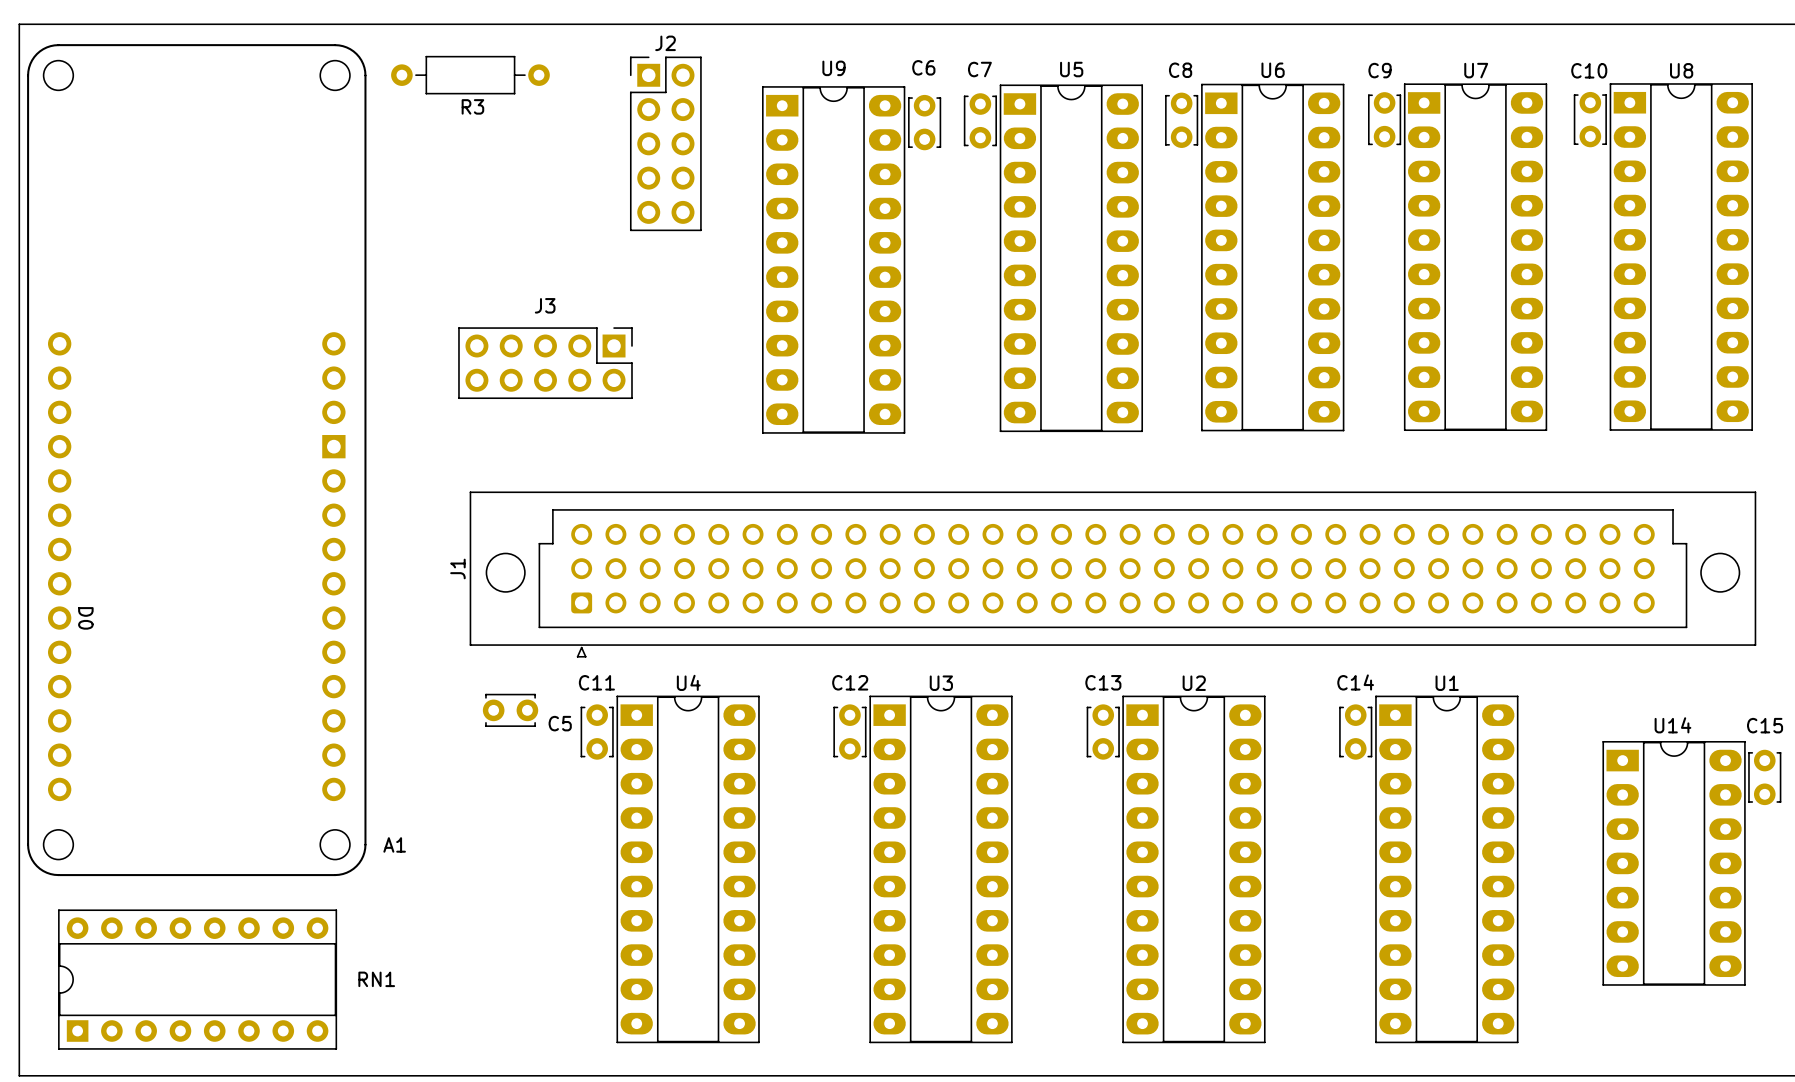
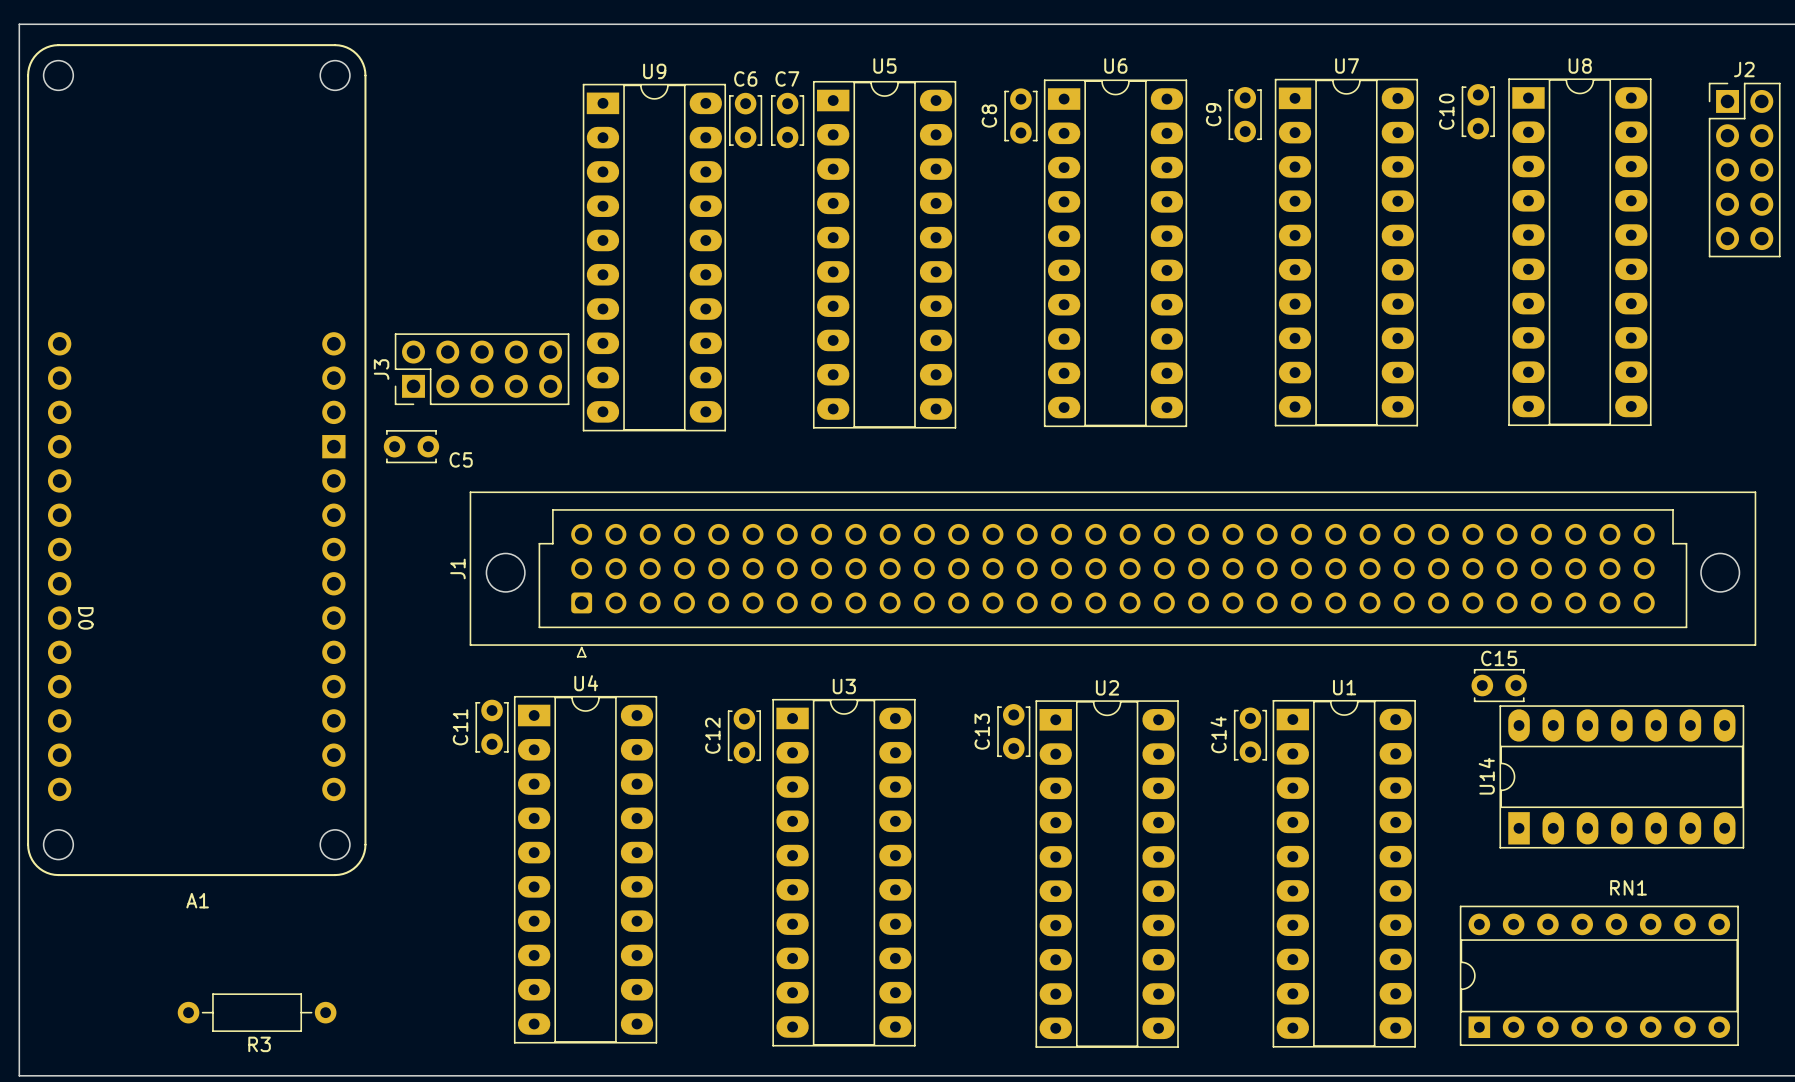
C6 name position: C6 (923, 67) -> C6 (745, 78)
U9 name position: U9 (833, 68) -> U9 (654, 71)
C7 name position: C7 (979, 69) -> C7 (787, 78)
C8 name rotation: 0° (1180, 70) -> 90° counterclockwise (989, 116)
C8 name position: C8 (1180, 70) -> C8 (989, 116)
C9 name rotation: 0° (1380, 70) -> 90° counterclockwise (1213, 114)
C9 name position: C9 (1380, 70) -> C9 (1213, 114)
C10 name rotation: 0° (1589, 70) -> 90° counterclockwise (1446, 111)
C10 name position: C10 (1589, 70) -> C10 (1446, 111)
R3 position: (470, 75) -> (257, 1012)
C9 position: (1384, 119) -> (1245, 114)
C10 position: (1590, 119) -> (1478, 111)
C7 position: (980, 120) -> (787, 120)
C8 position: (1181, 120) -> (1020, 116)
C6 position: (924, 122) -> (745, 120)
J2 position: (665, 143) -> (1744, 170)
U8 position: (1681, 256) -> (1579, 252)
U6 position: (1272, 257) -> (1115, 253)
U7 position: (1475, 257) -> (1346, 252)
U5 position: (1071, 258) -> (884, 254)
U9 position: (833, 259) -> (654, 257)
J3 name position: J3 (545, 305) -> J3 (381, 369)
J3 rotation: 0° (545, 363) -> 180° (482, 369)
C11 name rotation: 0° (596, 682) -> 90° counterclockwise (460, 727)
C11 name position: C11 (596, 682) -> C11 (460, 727)
C12 name rotation: 0° (850, 682) -> 90° counterclockwise (712, 735)
C12 name position: C12 (850, 682) -> C12 (712, 735)
C13 name rotation: 0° (1103, 682) -> 90° counterclockwise (982, 731)
C13 name position: C13 (1103, 682) -> C13 (982, 731)
C14 name rotation: 0° (1355, 682) -> 90° counterclockwise (1218, 734)
C14 name position: C14 (1355, 682) -> C14 (1218, 734)
C5 position: (510, 710) -> (411, 446)
C11 position: (597, 732) -> (492, 727)
C12 position: (849, 732) -> (744, 735)
C13 position: (1103, 732) -> (1013, 731)
C14 position: (1355, 732) -> (1250, 735)
C15 rotation: 0° (1764, 777) -> 90° clockwise (1499, 685)
C15 position: (1764, 777) -> (1499, 685)
A1 name position: A1 (394, 844) -> A1 (197, 900)
U14 rotation: 0° (1674, 863) -> 90° counterclockwise (1621, 776)
U4 position: (688, 869) -> (585, 869)
U3 position: (941, 869) -> (844, 872)
U2 position: (1193, 869) -> (1107, 874)
U1 position: (1446, 869) -> (1344, 873)
RN1 position: (197, 979) -> (1599, 975)
RN1 name position: RN1 (376, 979) -> RN1 (1628, 887)

